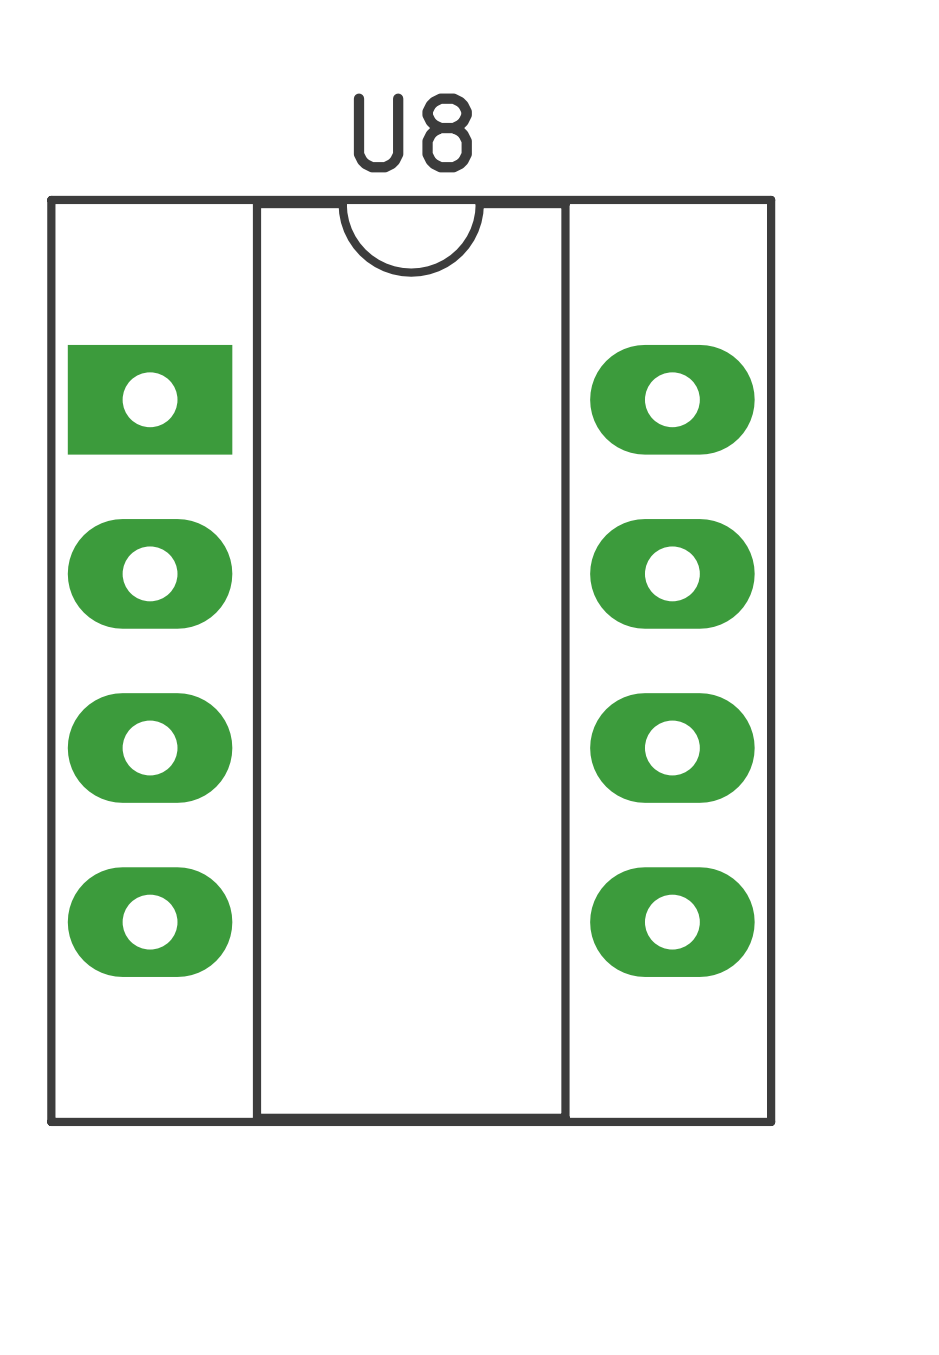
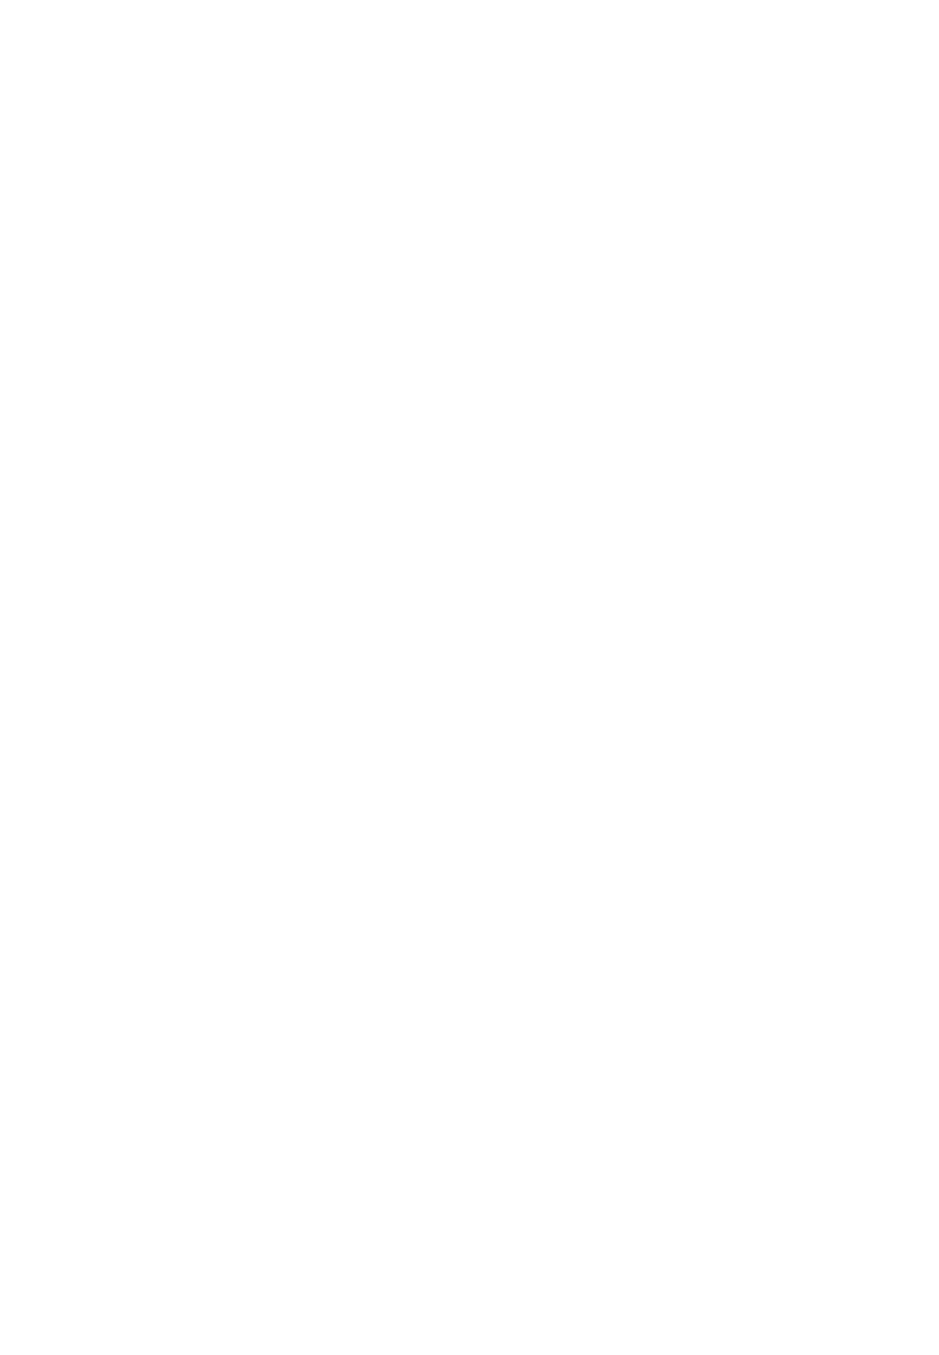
U8: (411, 660) -> none

